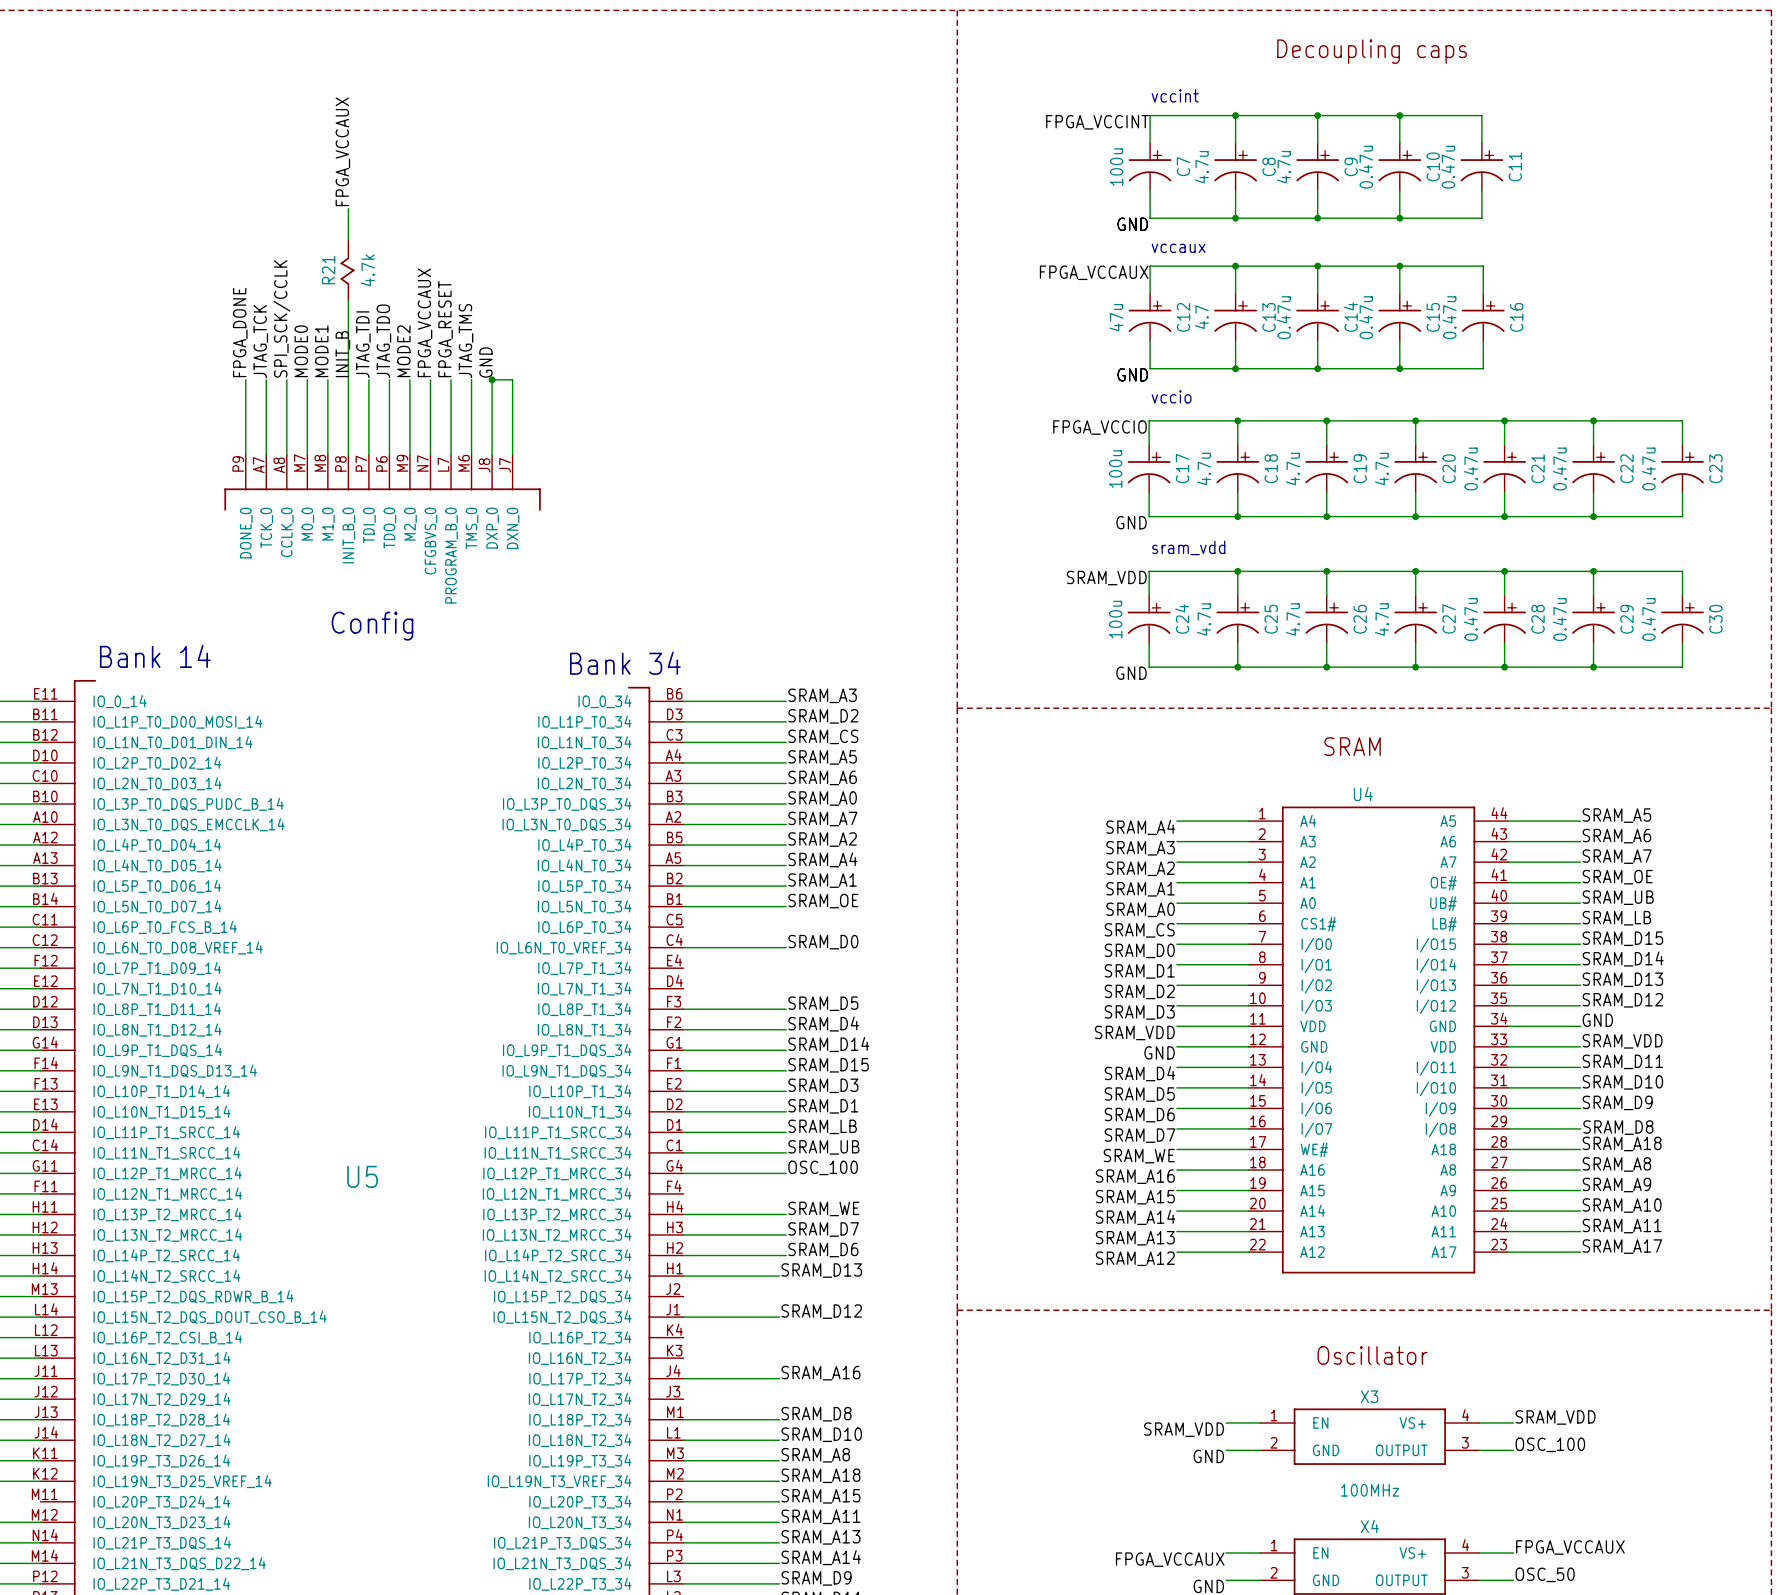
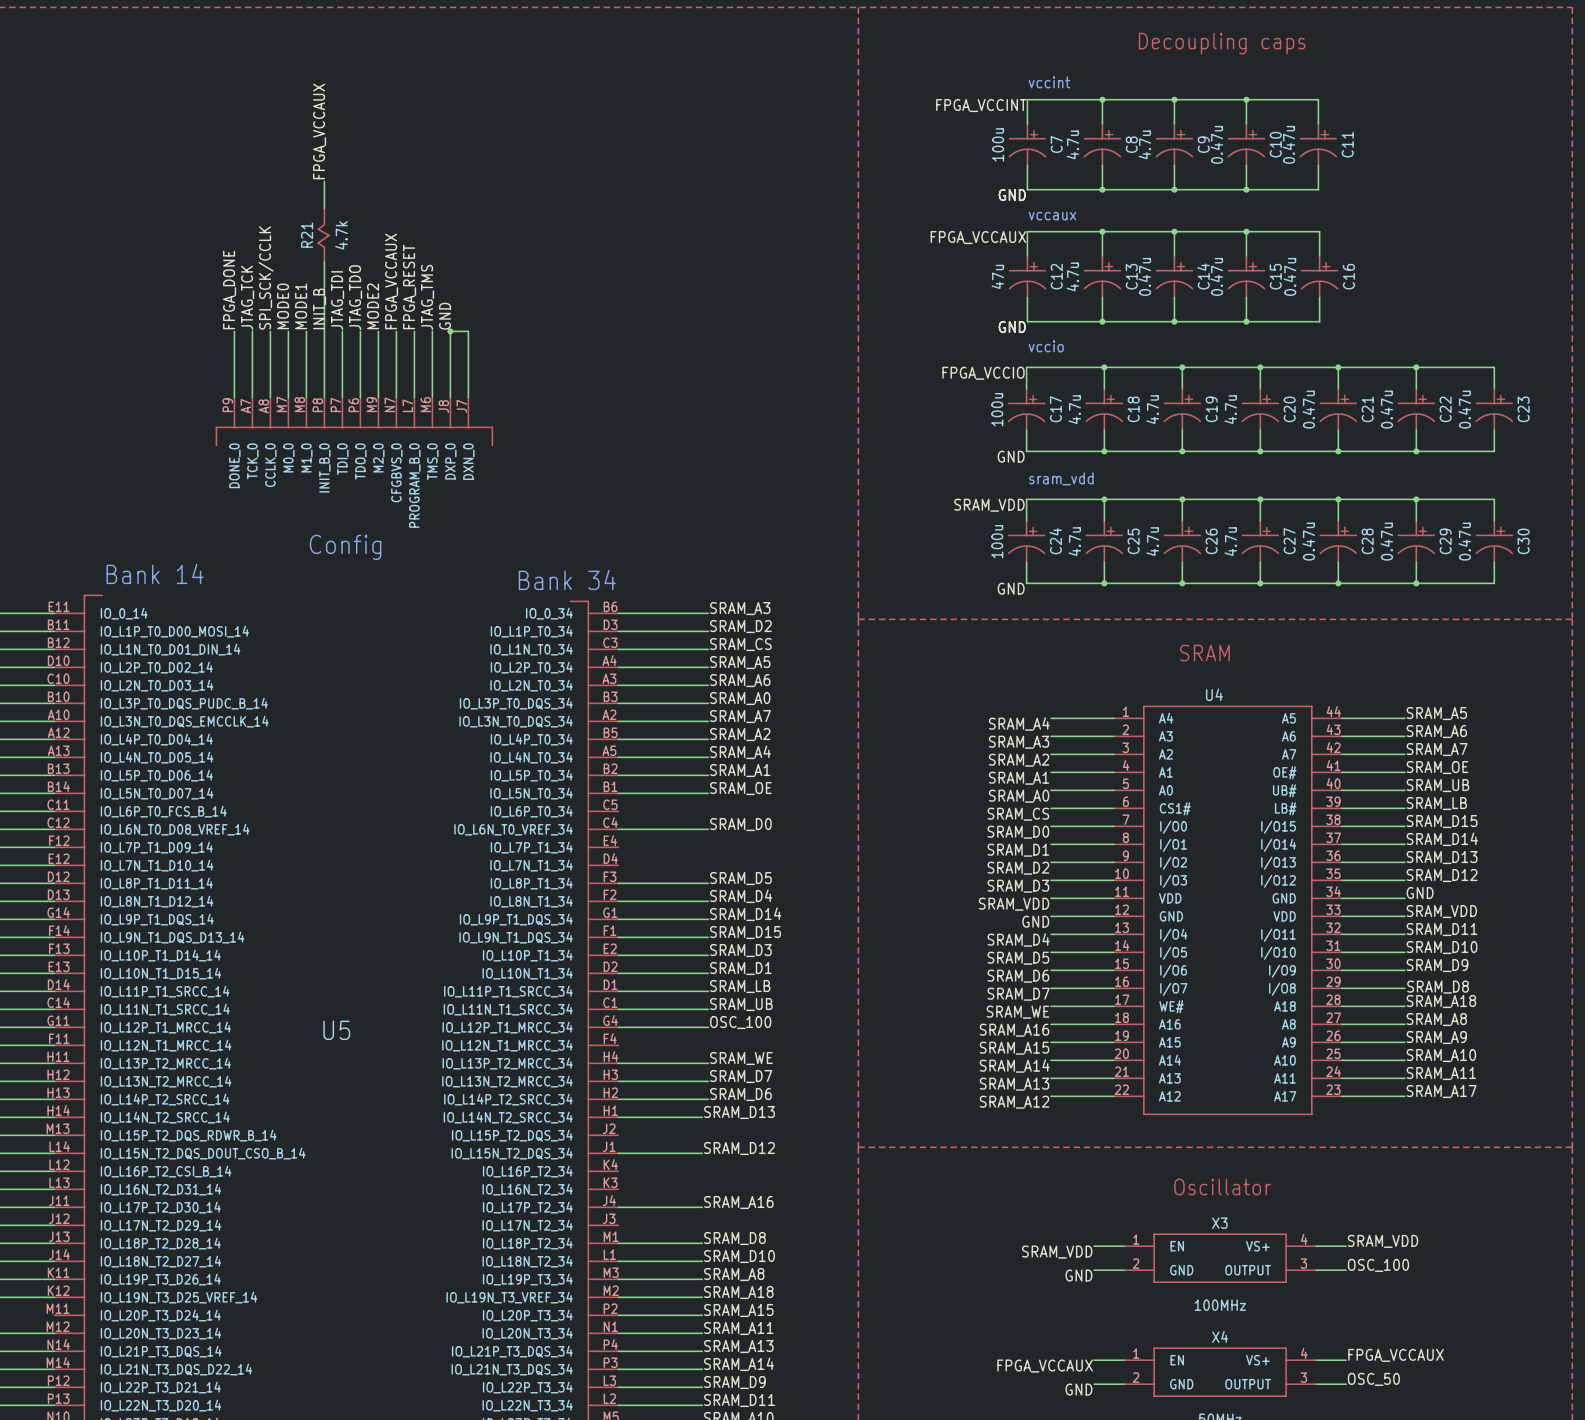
C13 value: 4.7 (1201, 317) -> 4.7u (1072, 276)

